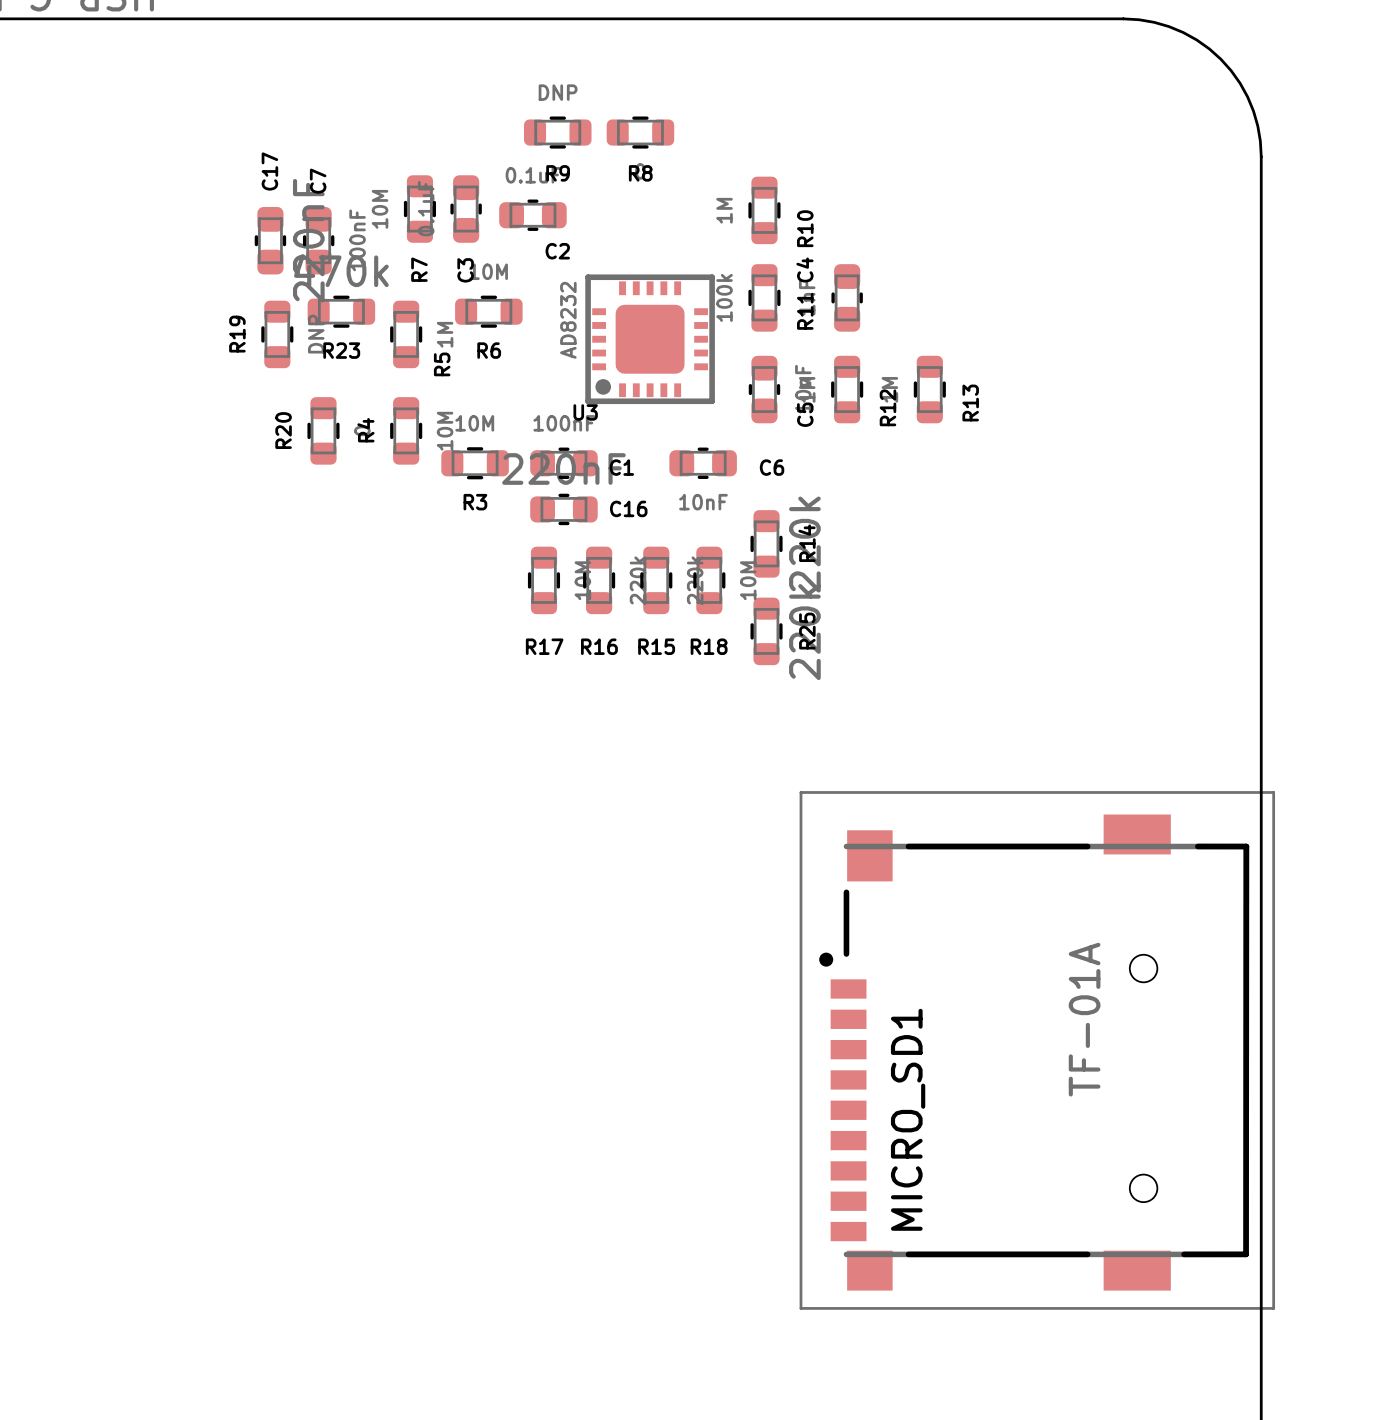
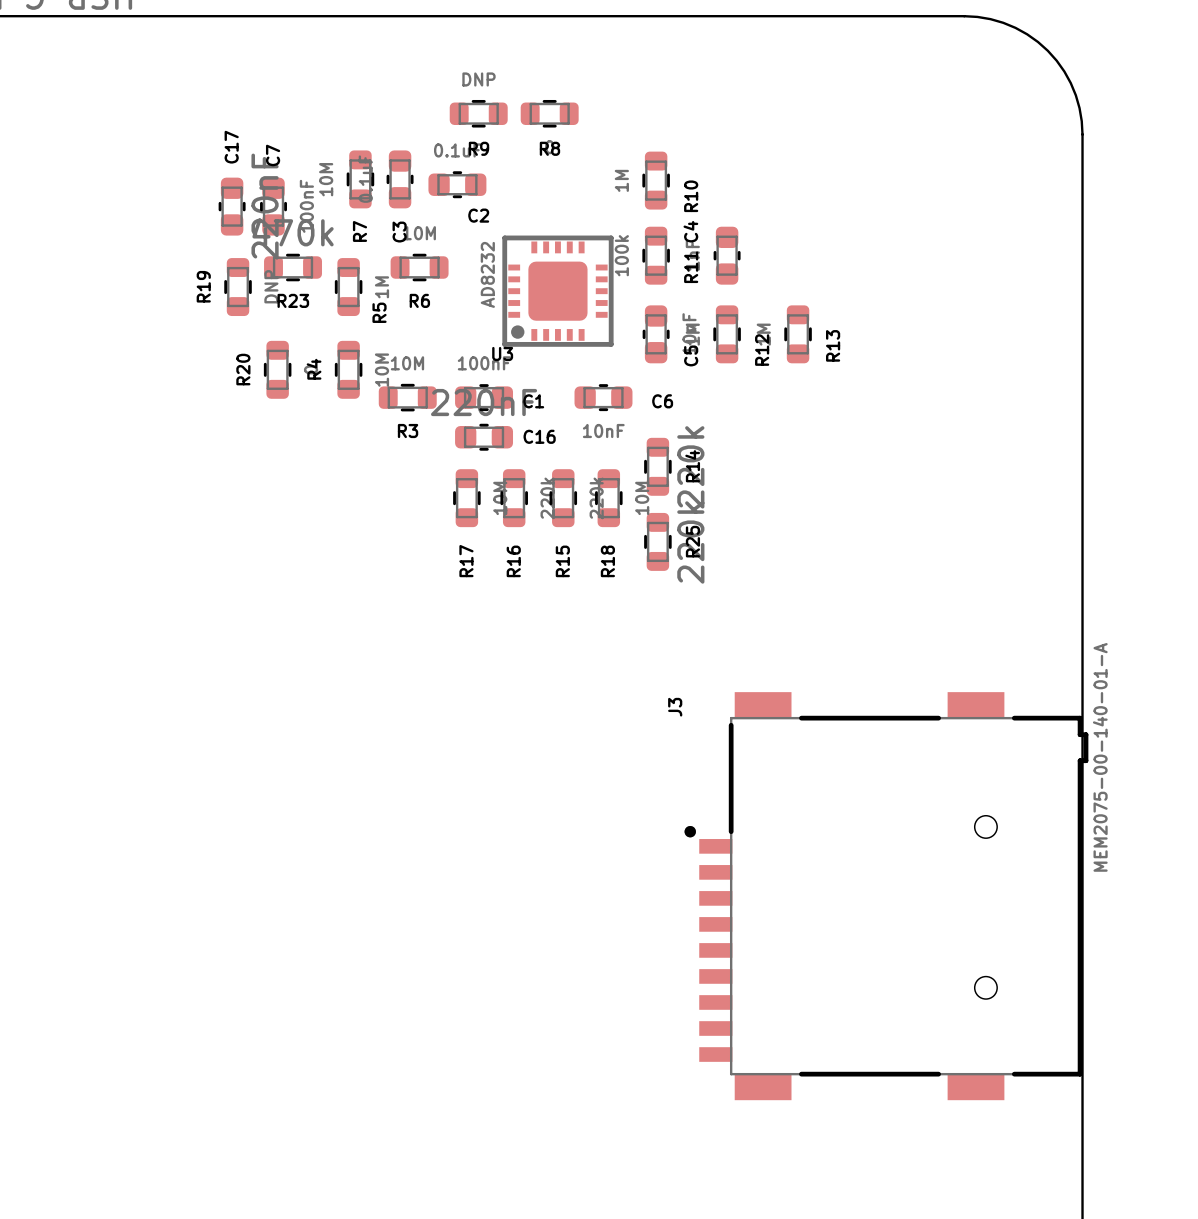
R17 name rotation: 0° (544, 646) -> 90° counterclockwise (466, 561)
R16 name rotation: 0° (599, 646) -> 90° counterclockwise (513, 561)
R15 name rotation: 0° (656, 646) -> 90° counterclockwise (562, 561)
R18 name rotation: 0° (709, 646) -> 90° counterclockwise (607, 561)
J3: none -> MEM2075-00-140-01-A (886, 896)
MICRO_SD1: TF-01A (1037, 1050) -> none

